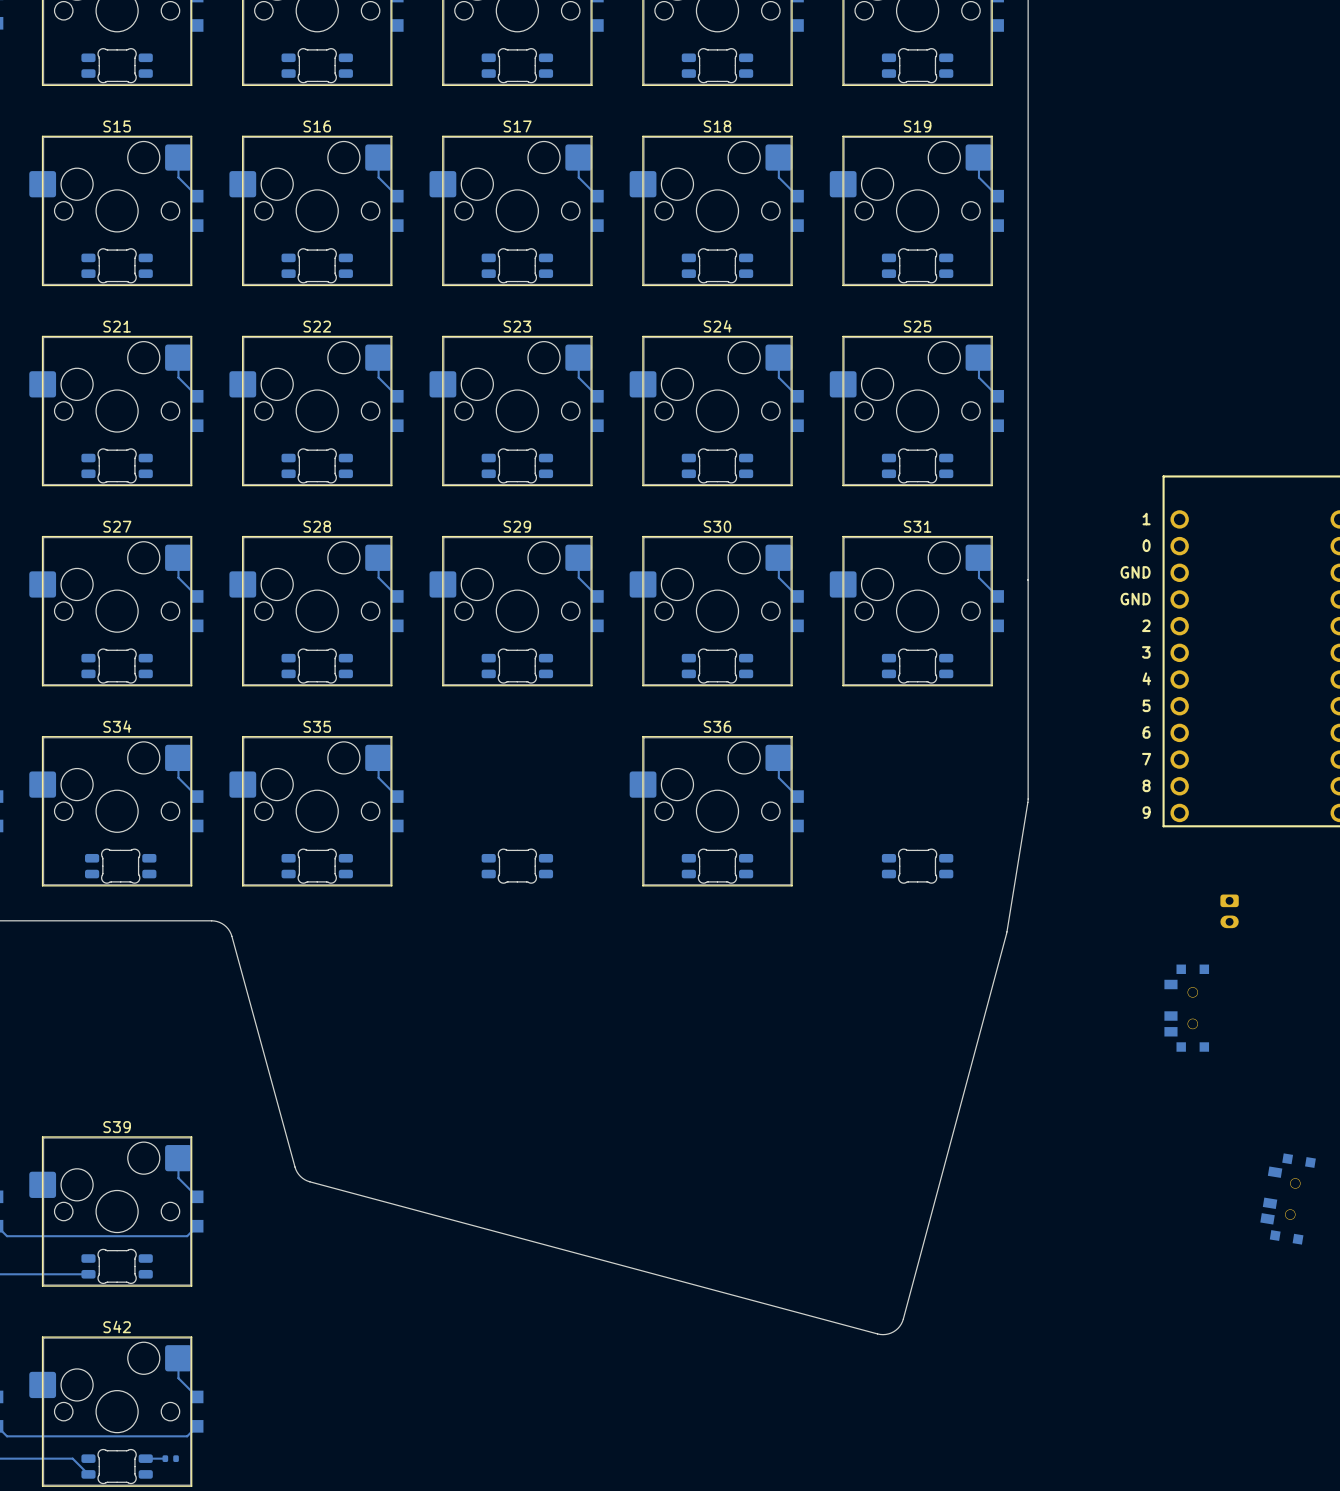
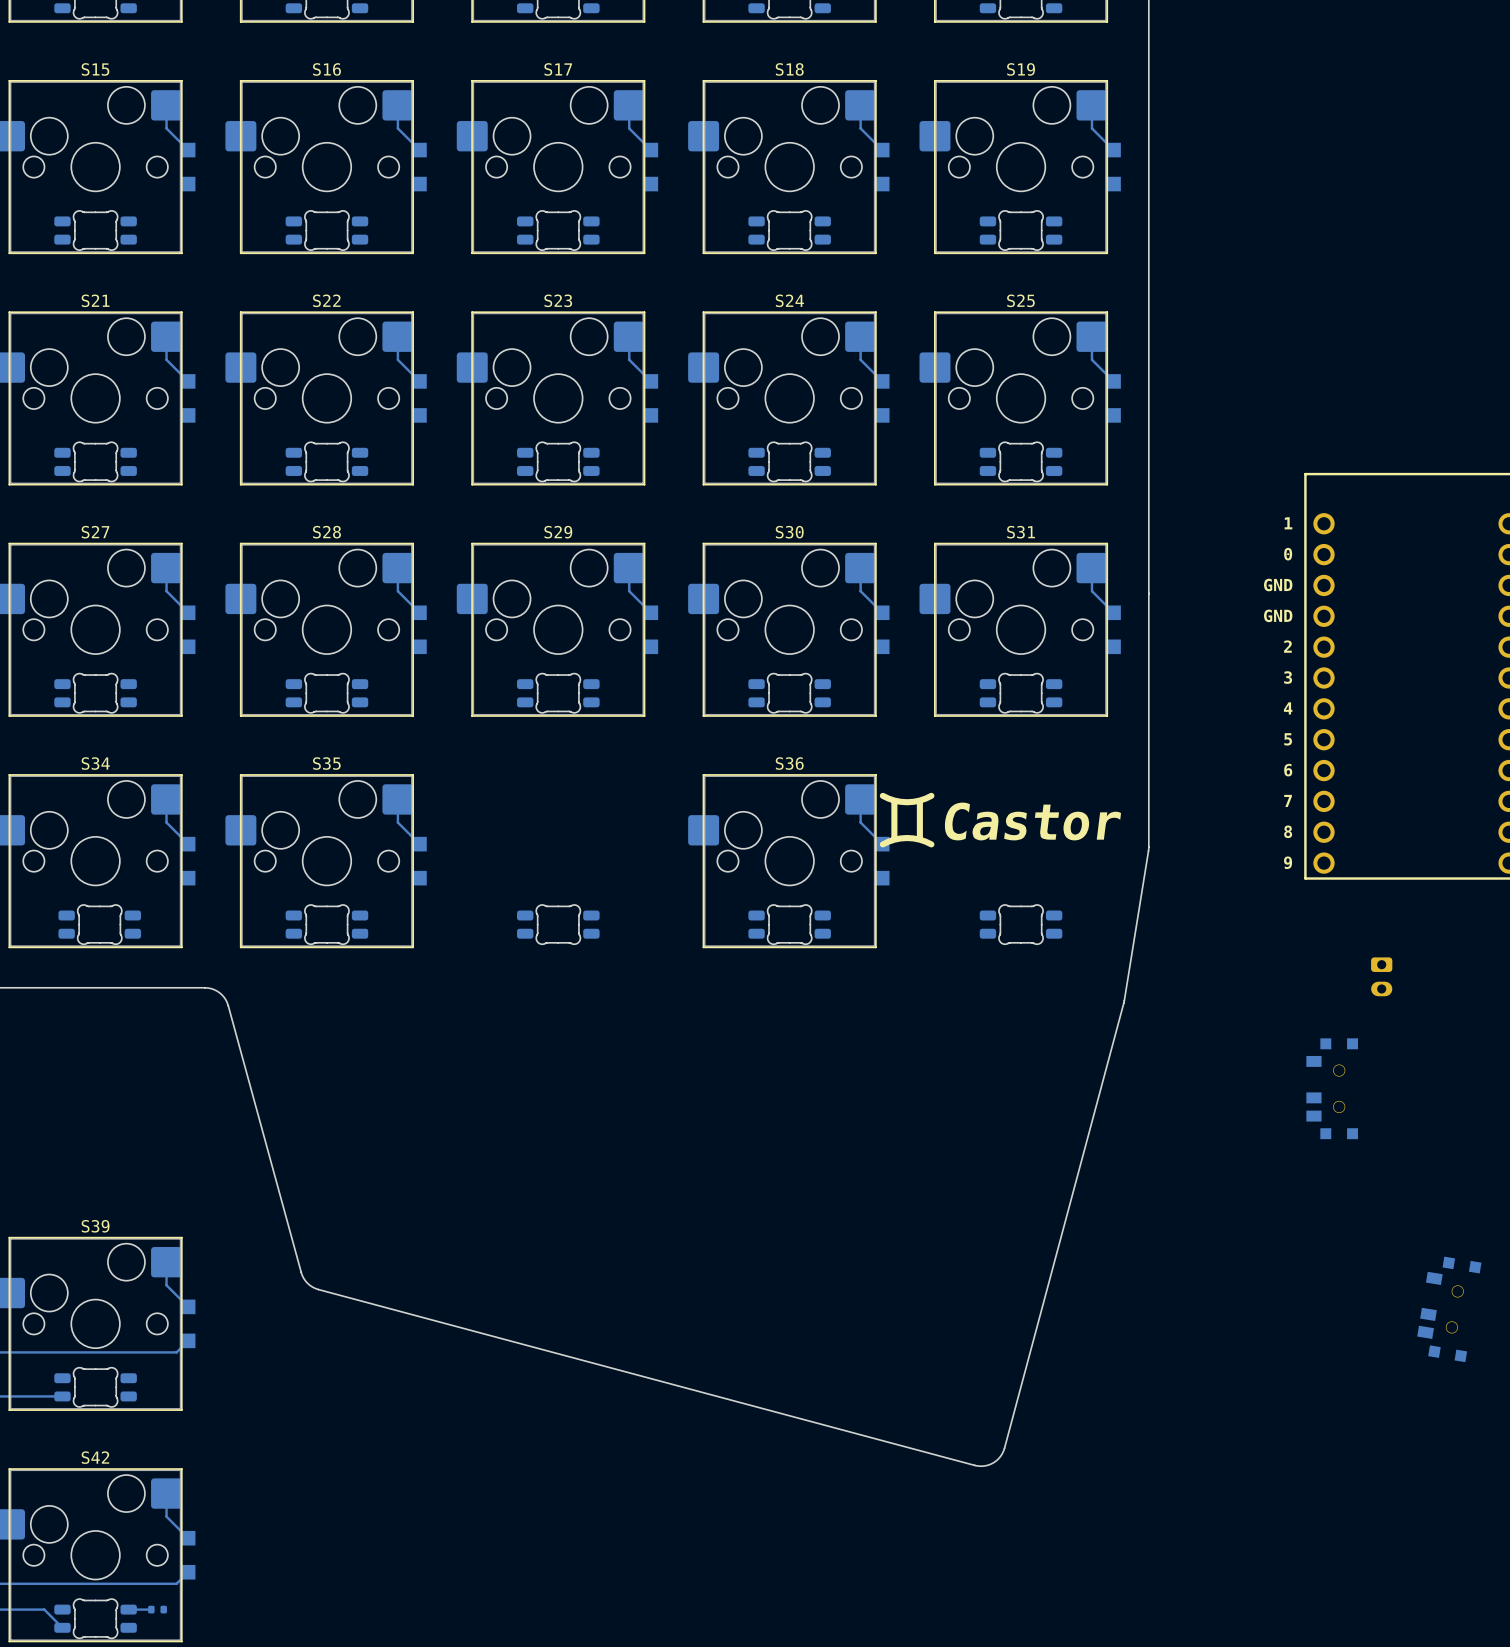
line: none -> (882, 795) (894, 800) (907, 802) (919, 800) (931, 795)
line: none -> (894, 801) (894, 838)
line: none -> (919, 801) (919, 838)
text: none -> Castor (1032, 821)
line: none -> (882, 844) (894, 839) (907, 838) (919, 839) (931, 844)

